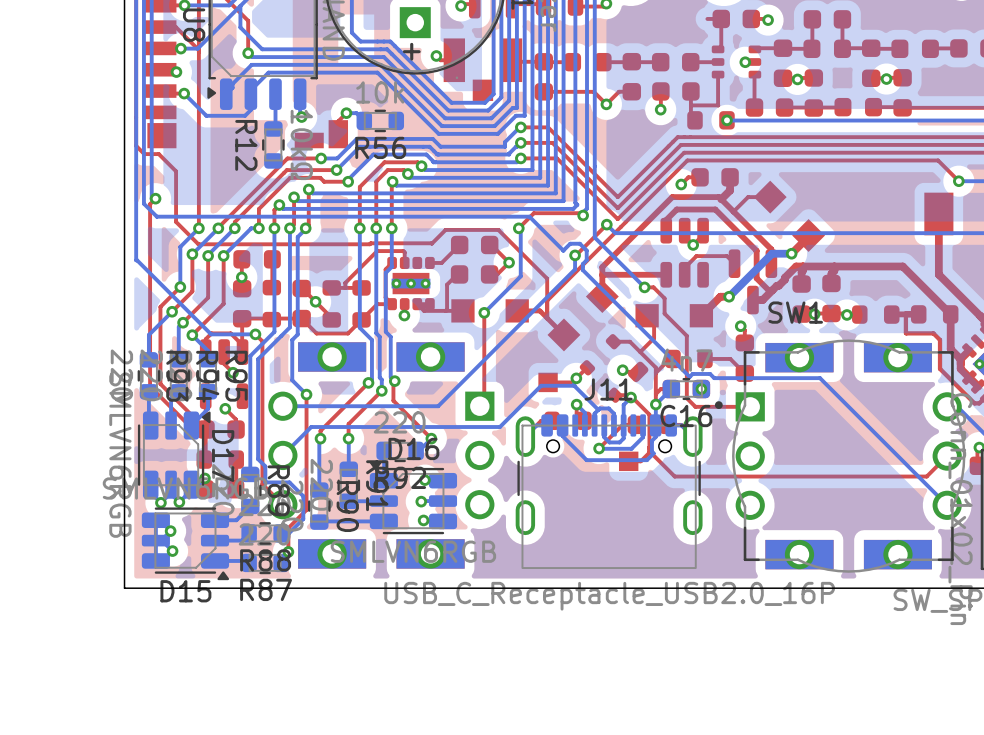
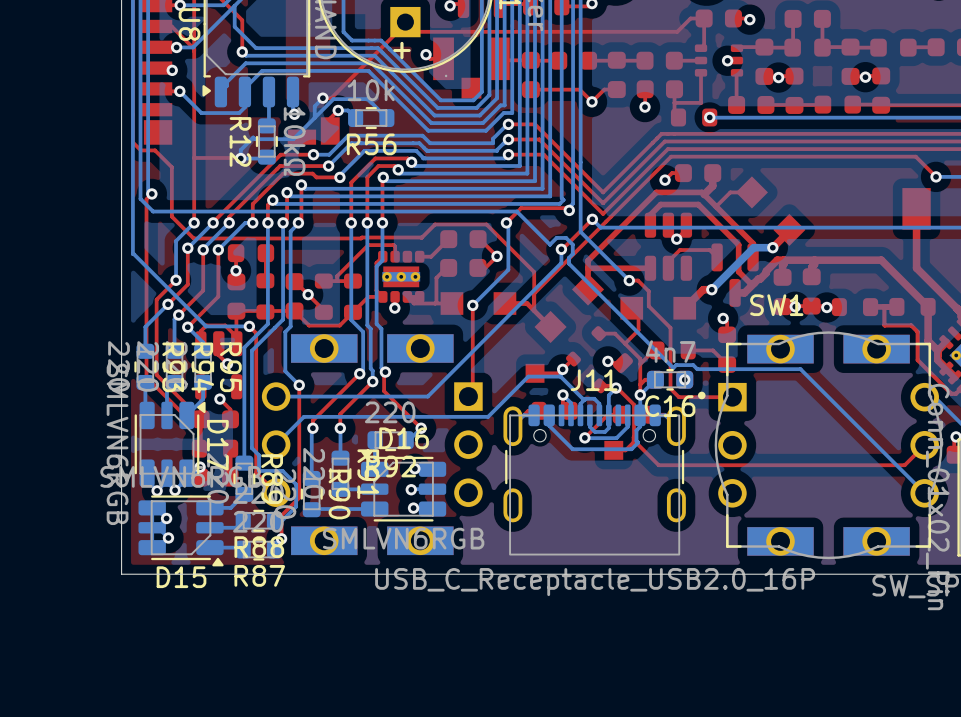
top track: none -> (690, 18) (677, 31) (415, 31) (405, 22) (331, 98) (322, 98)
bottom track: none -> (322, 98) (314, 106) (314, 117)
via: none -> (322, 98)
bottom track: none -> (386, 118) (367, 99) (333, 99) (293, 139) (254, 139) (253, 137) (240, 150) (240, 158) (266, 157)
top track: none -> (194, 157) (240, 158)
via: none -> (240, 158)

